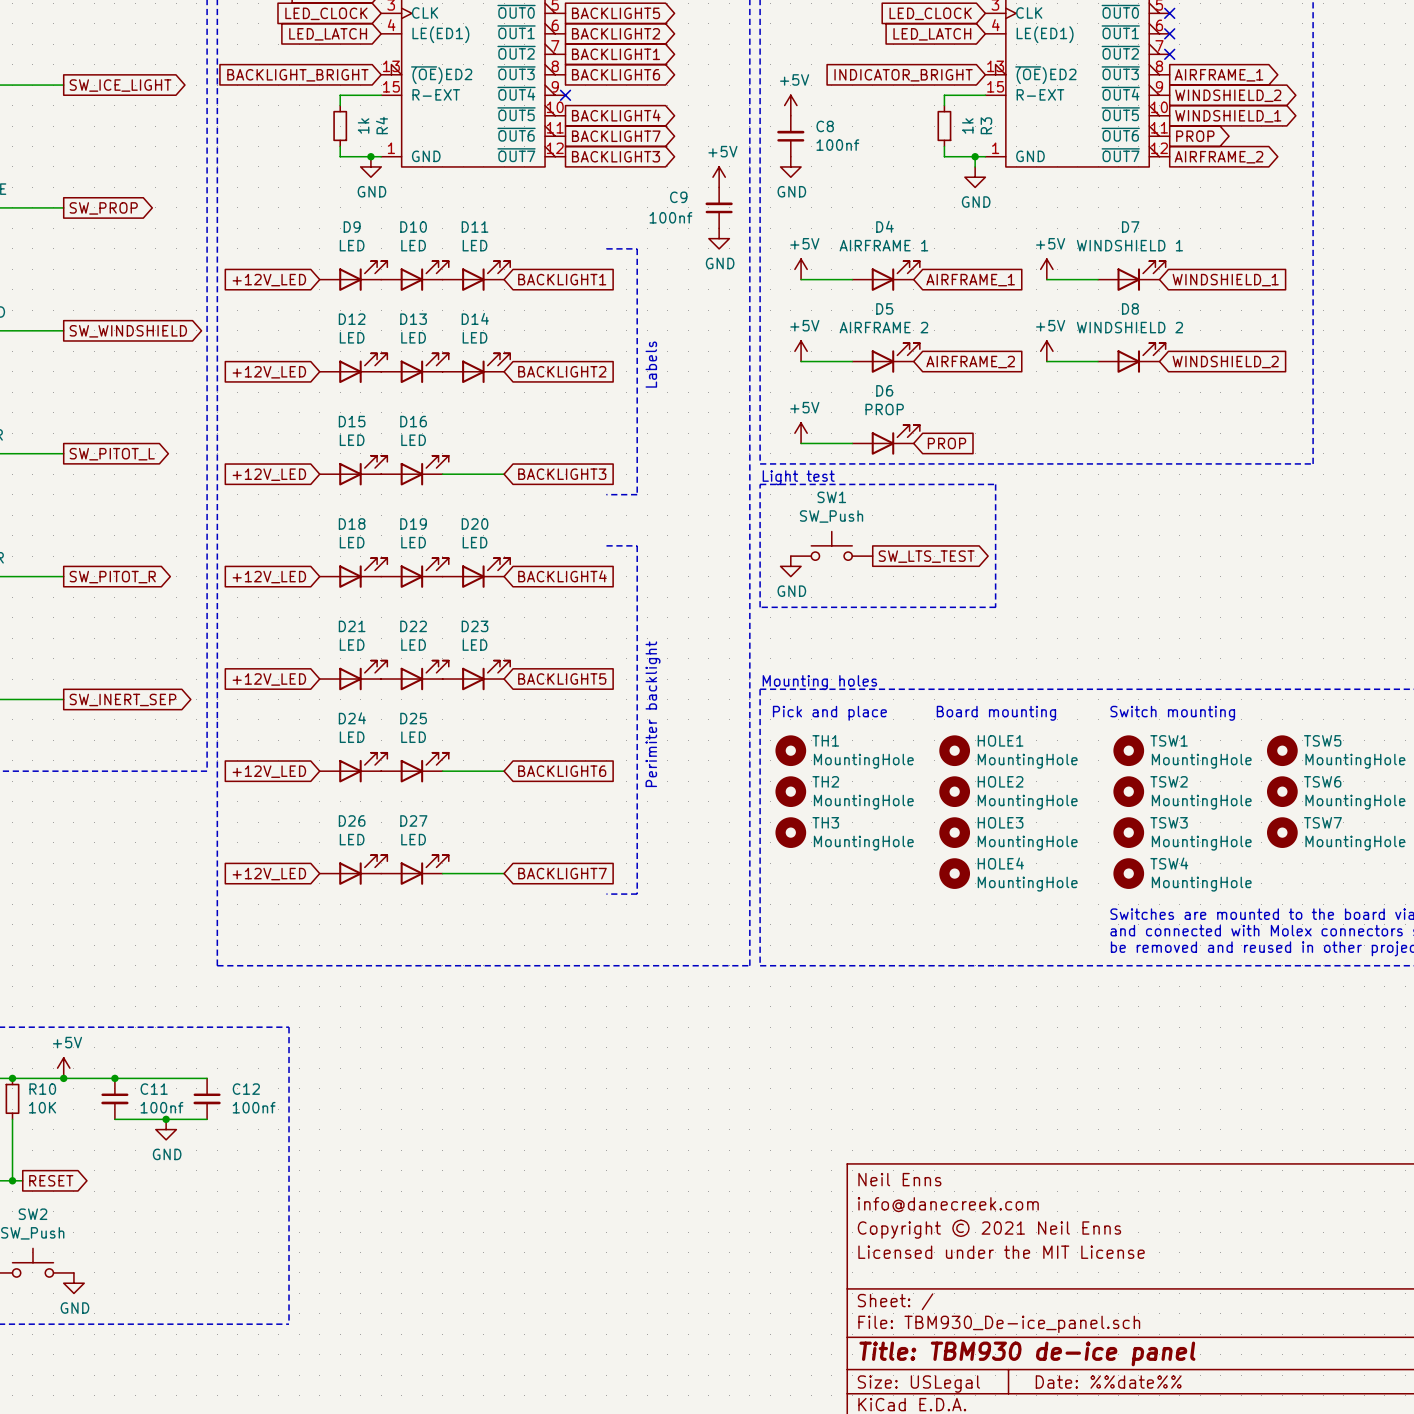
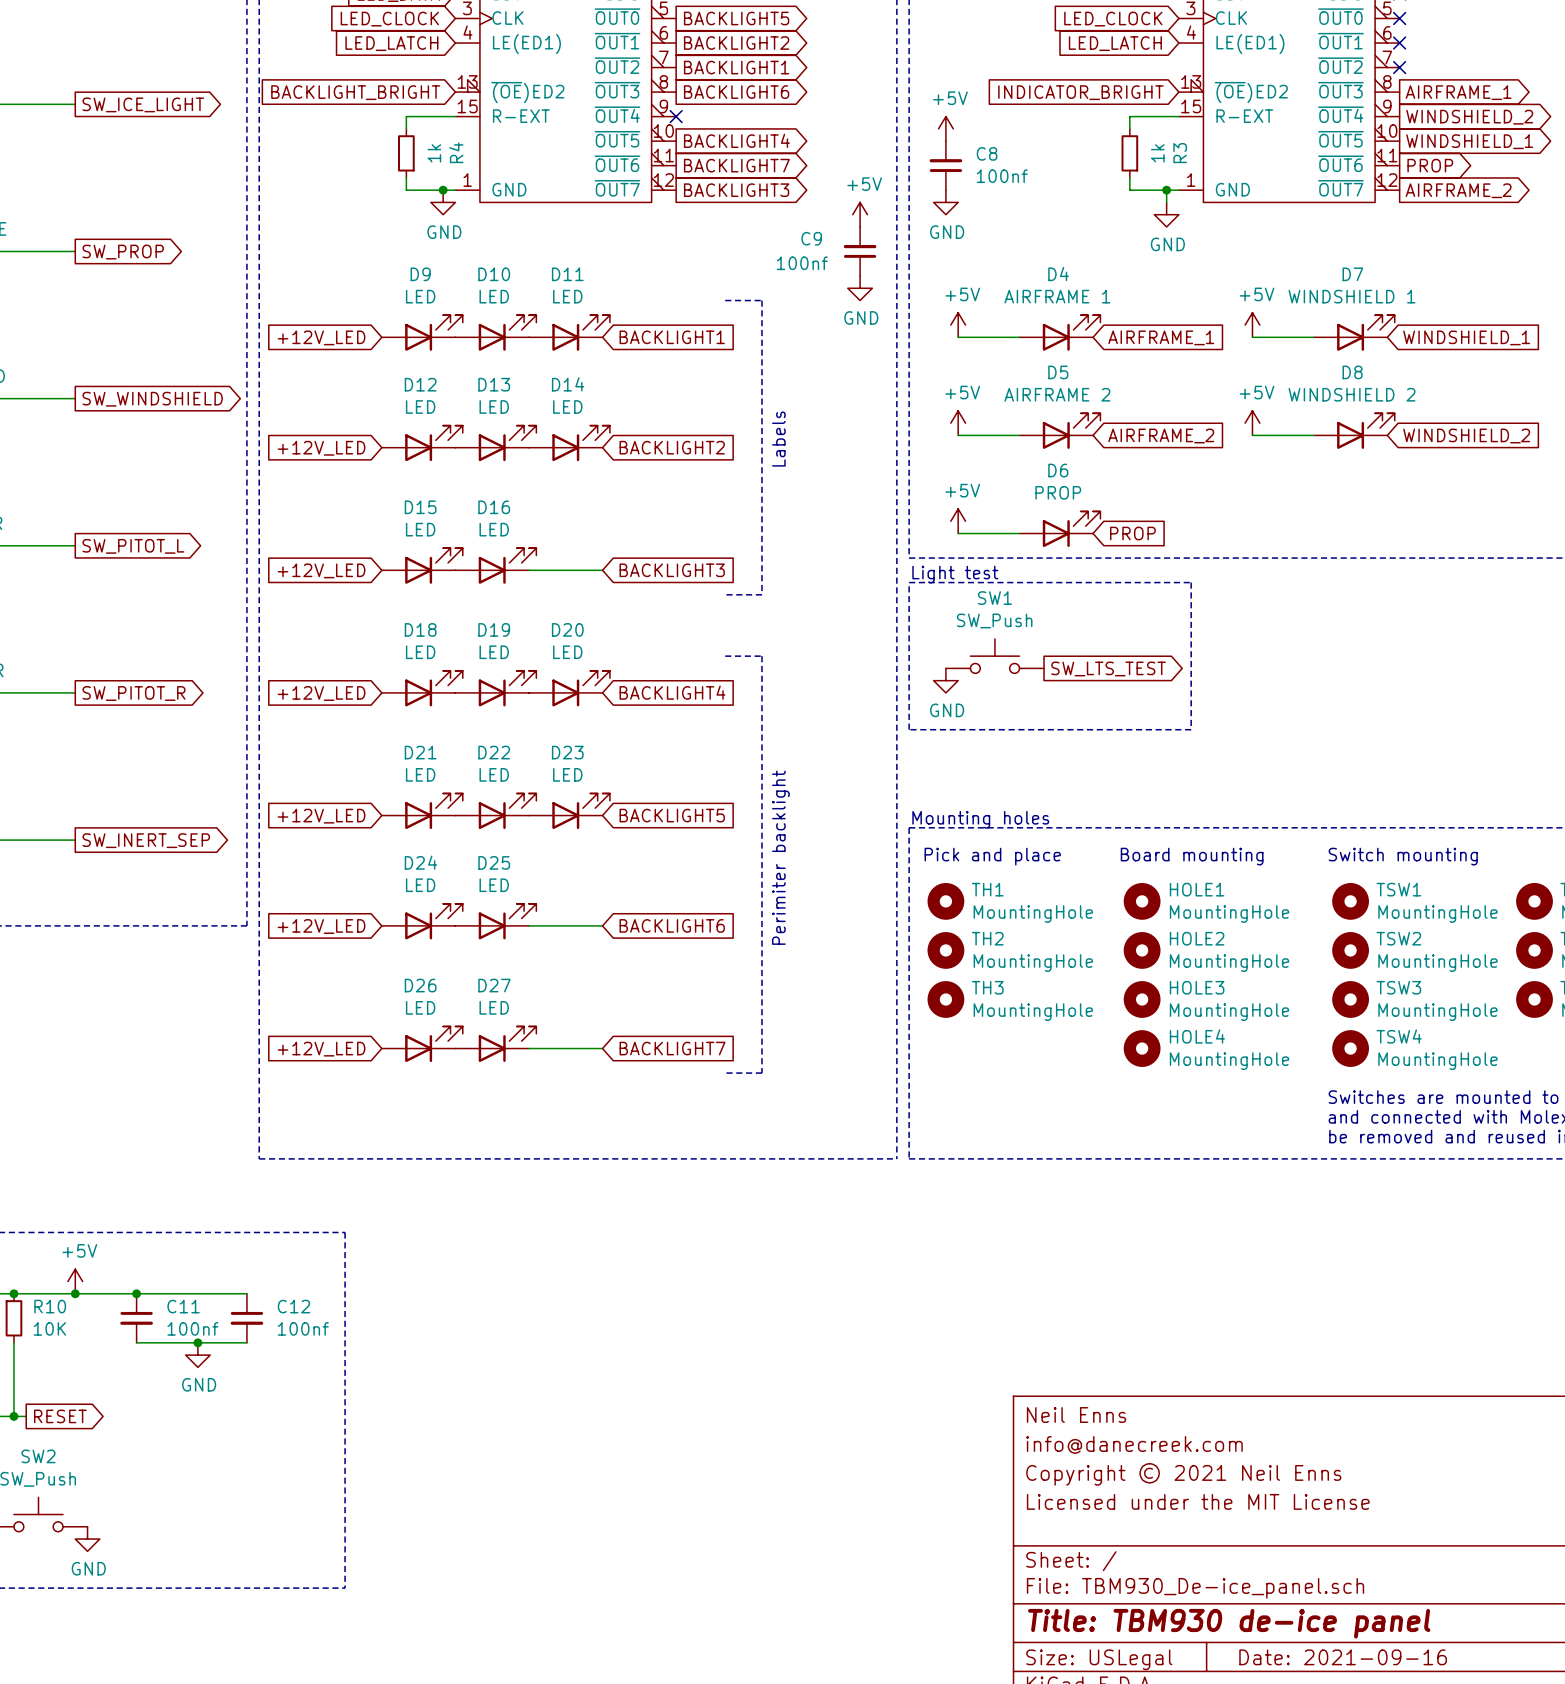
title block: Date: %%date%% (1108, 1382) -> Date: 2021-09-16 (1343, 1657)

